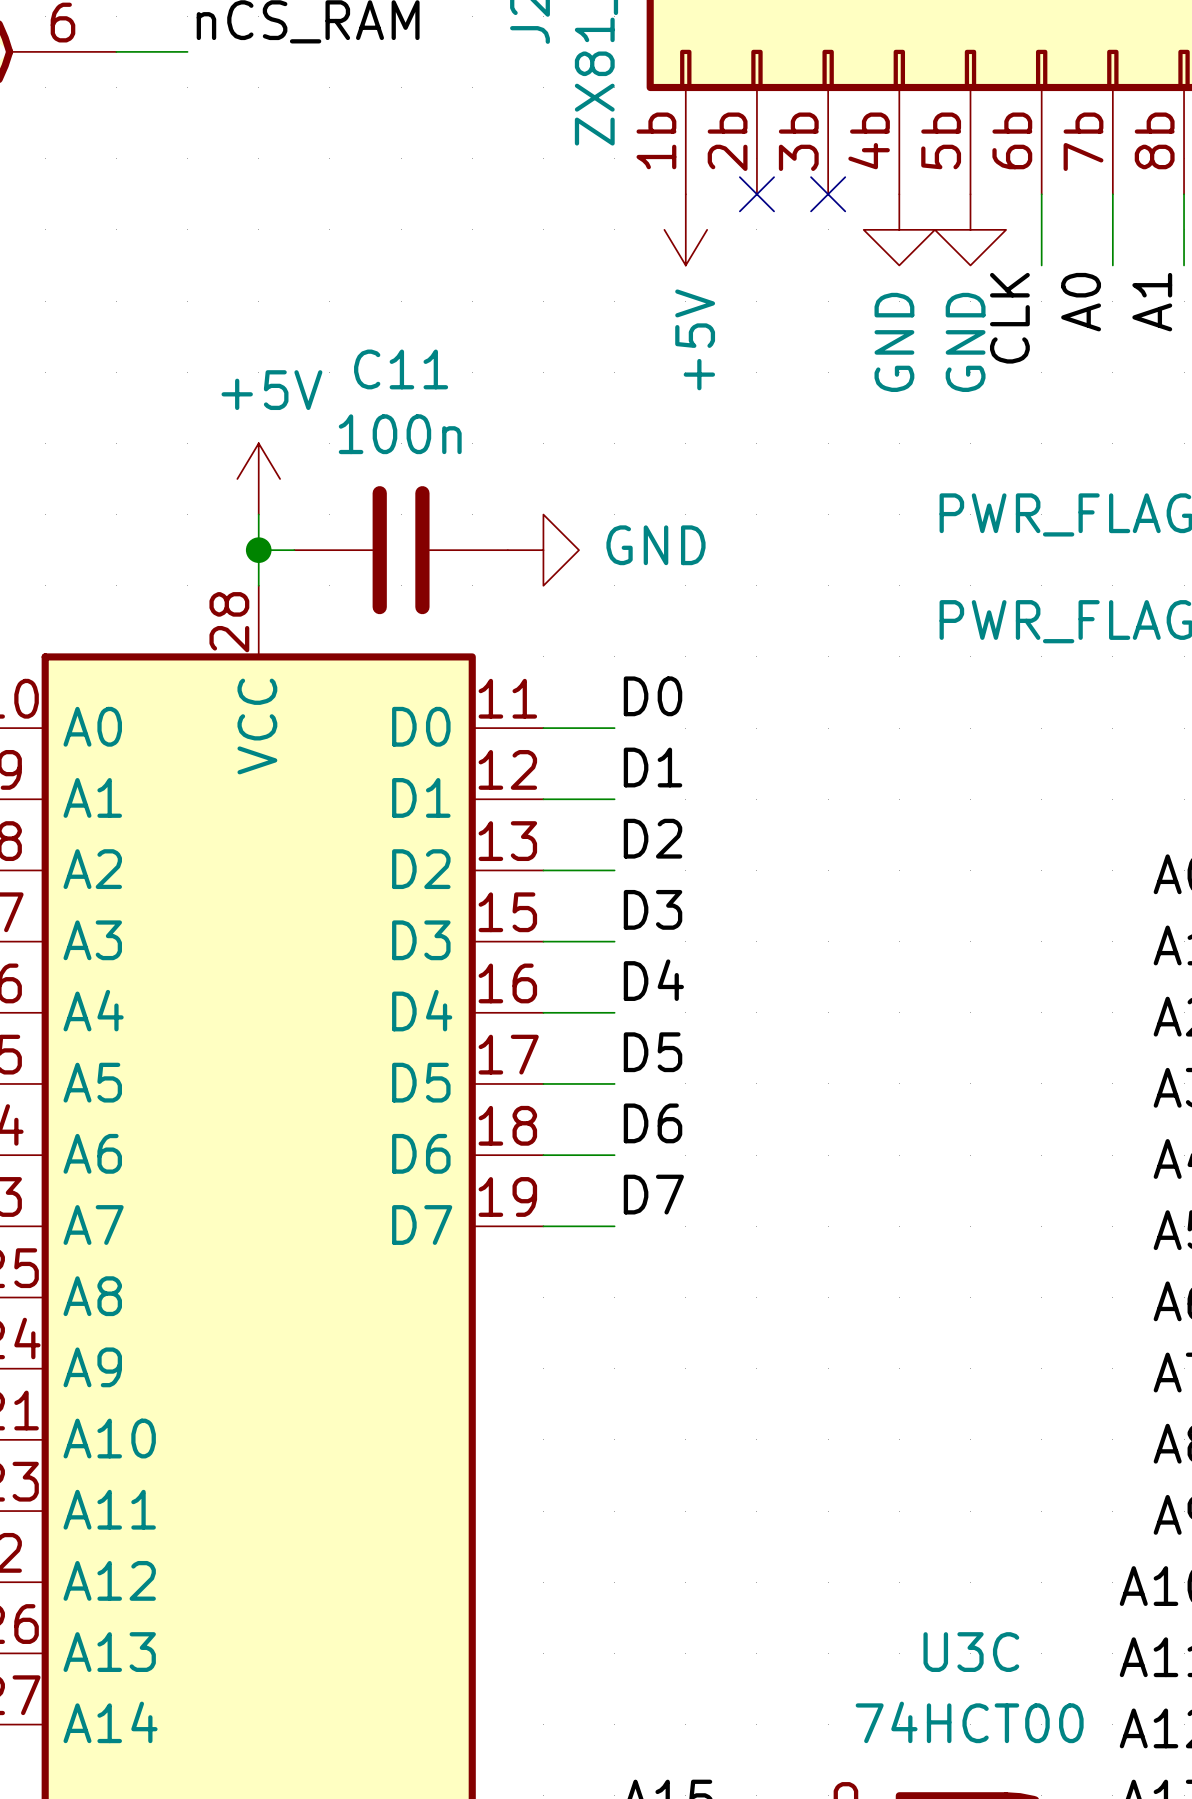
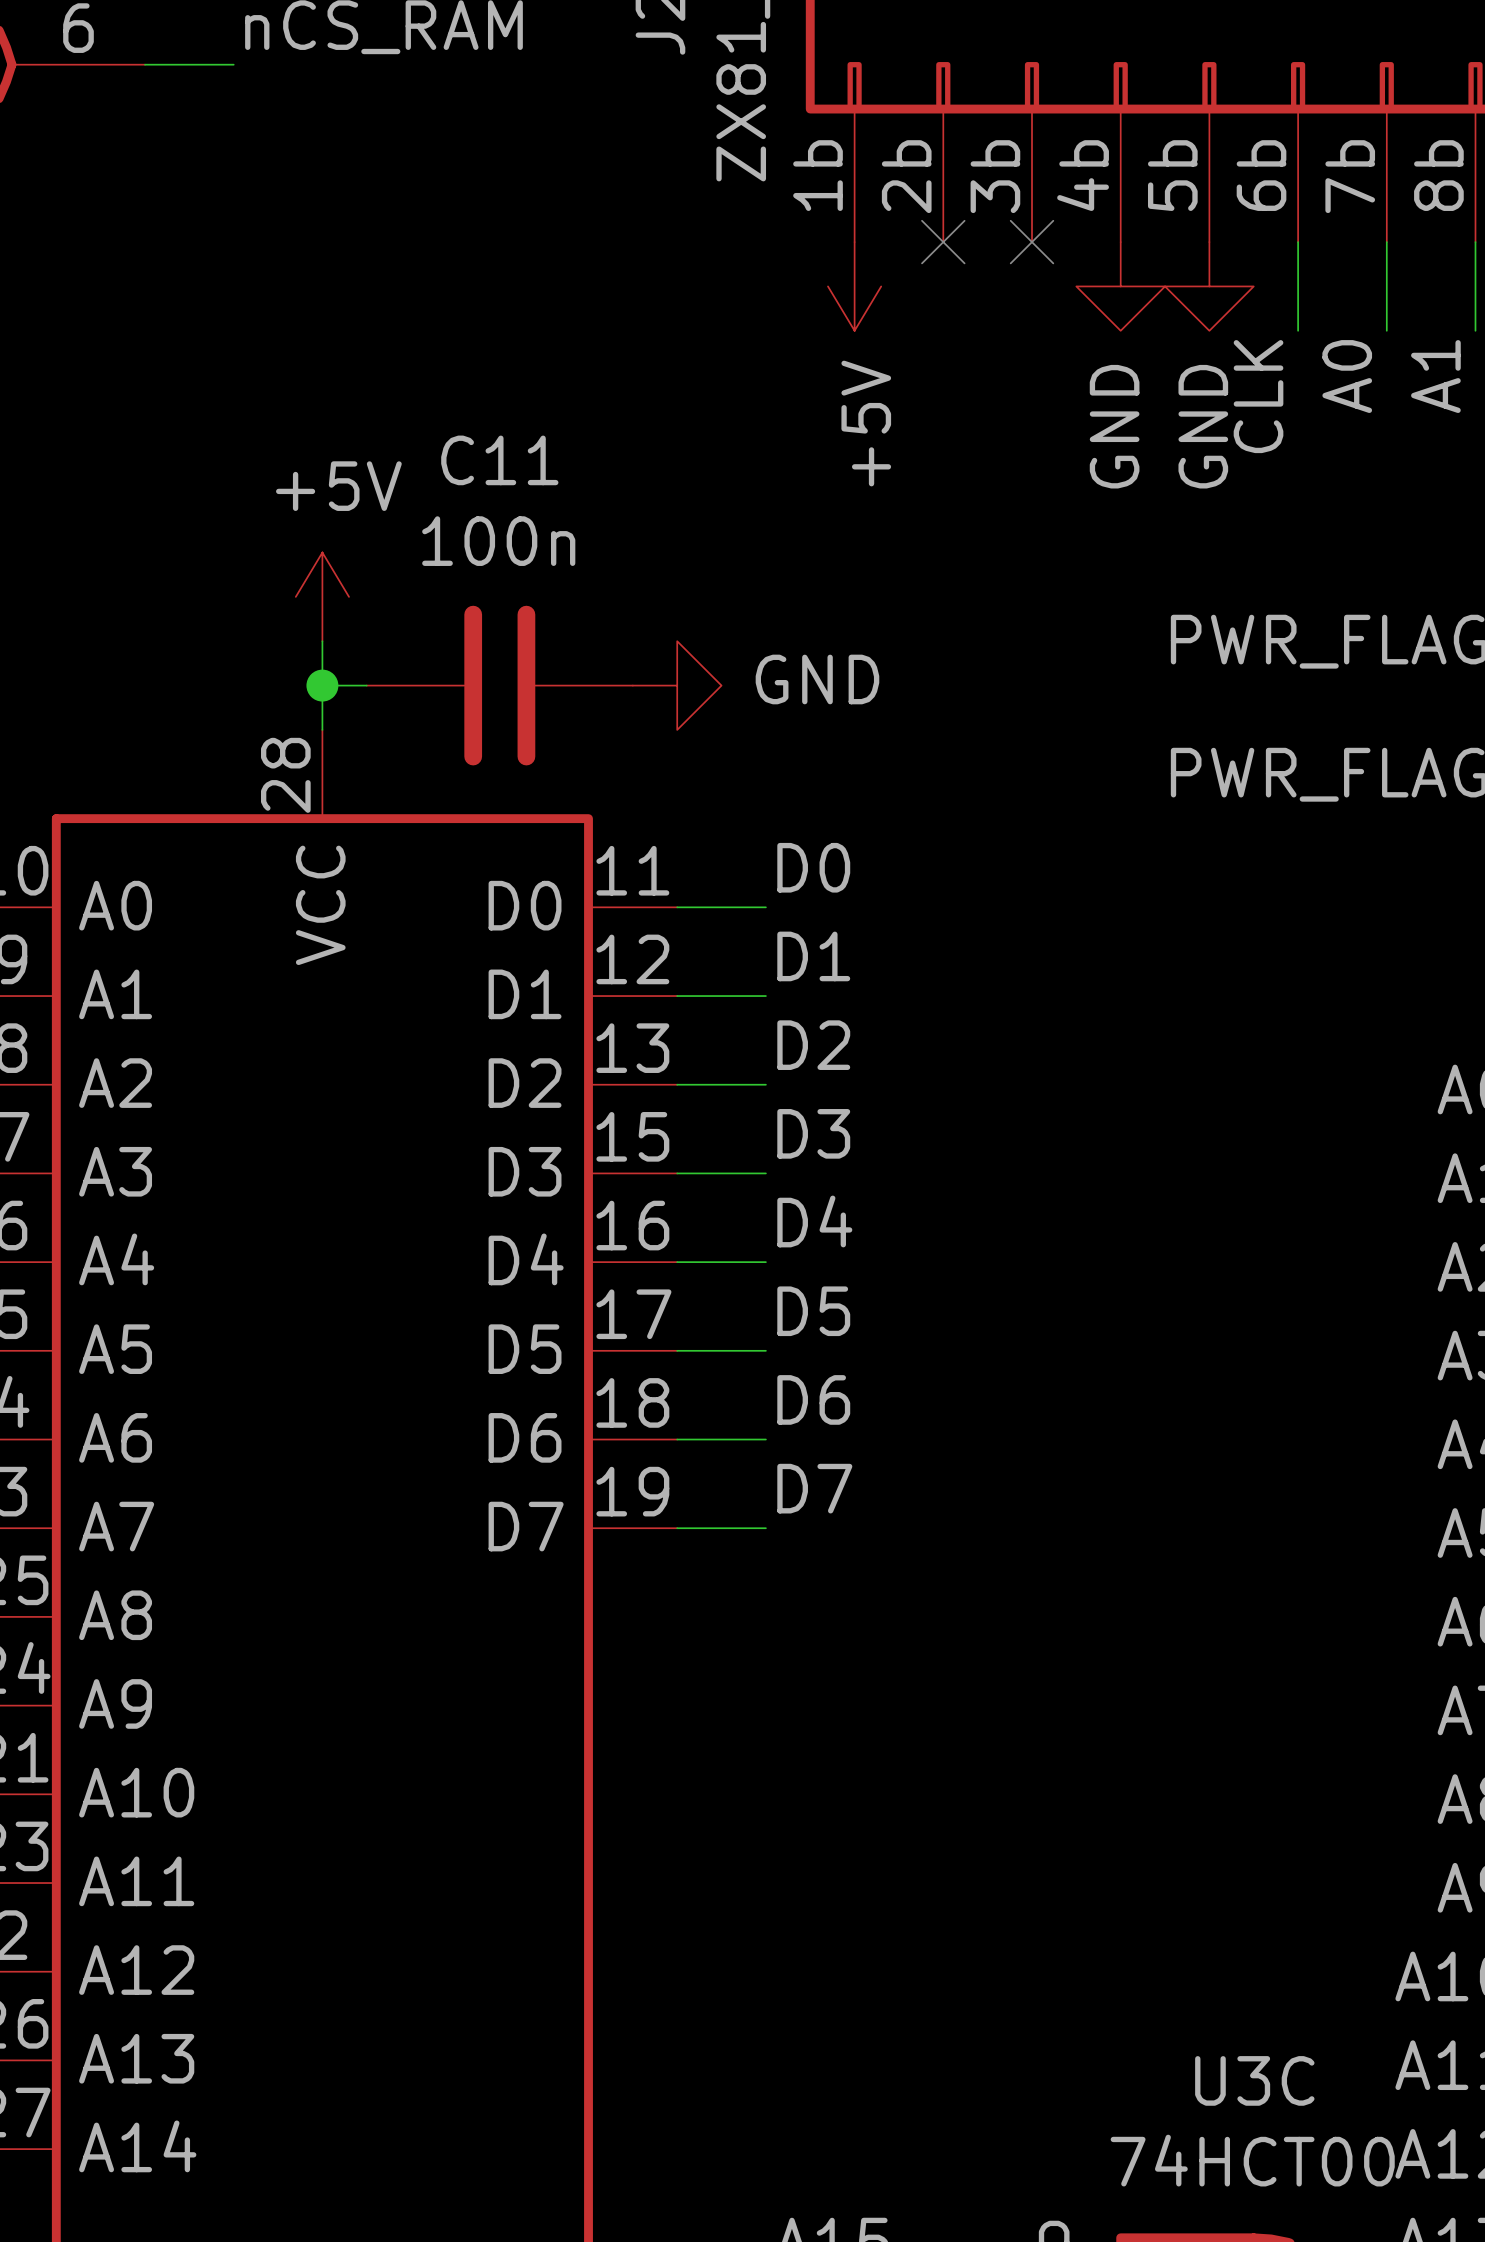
U3C name position: U3C (971, 1652) -> U3C (1254, 2080)
U3C value position: 74HCT00 (969, 1722) -> 74HCT00 (1252, 2160)

